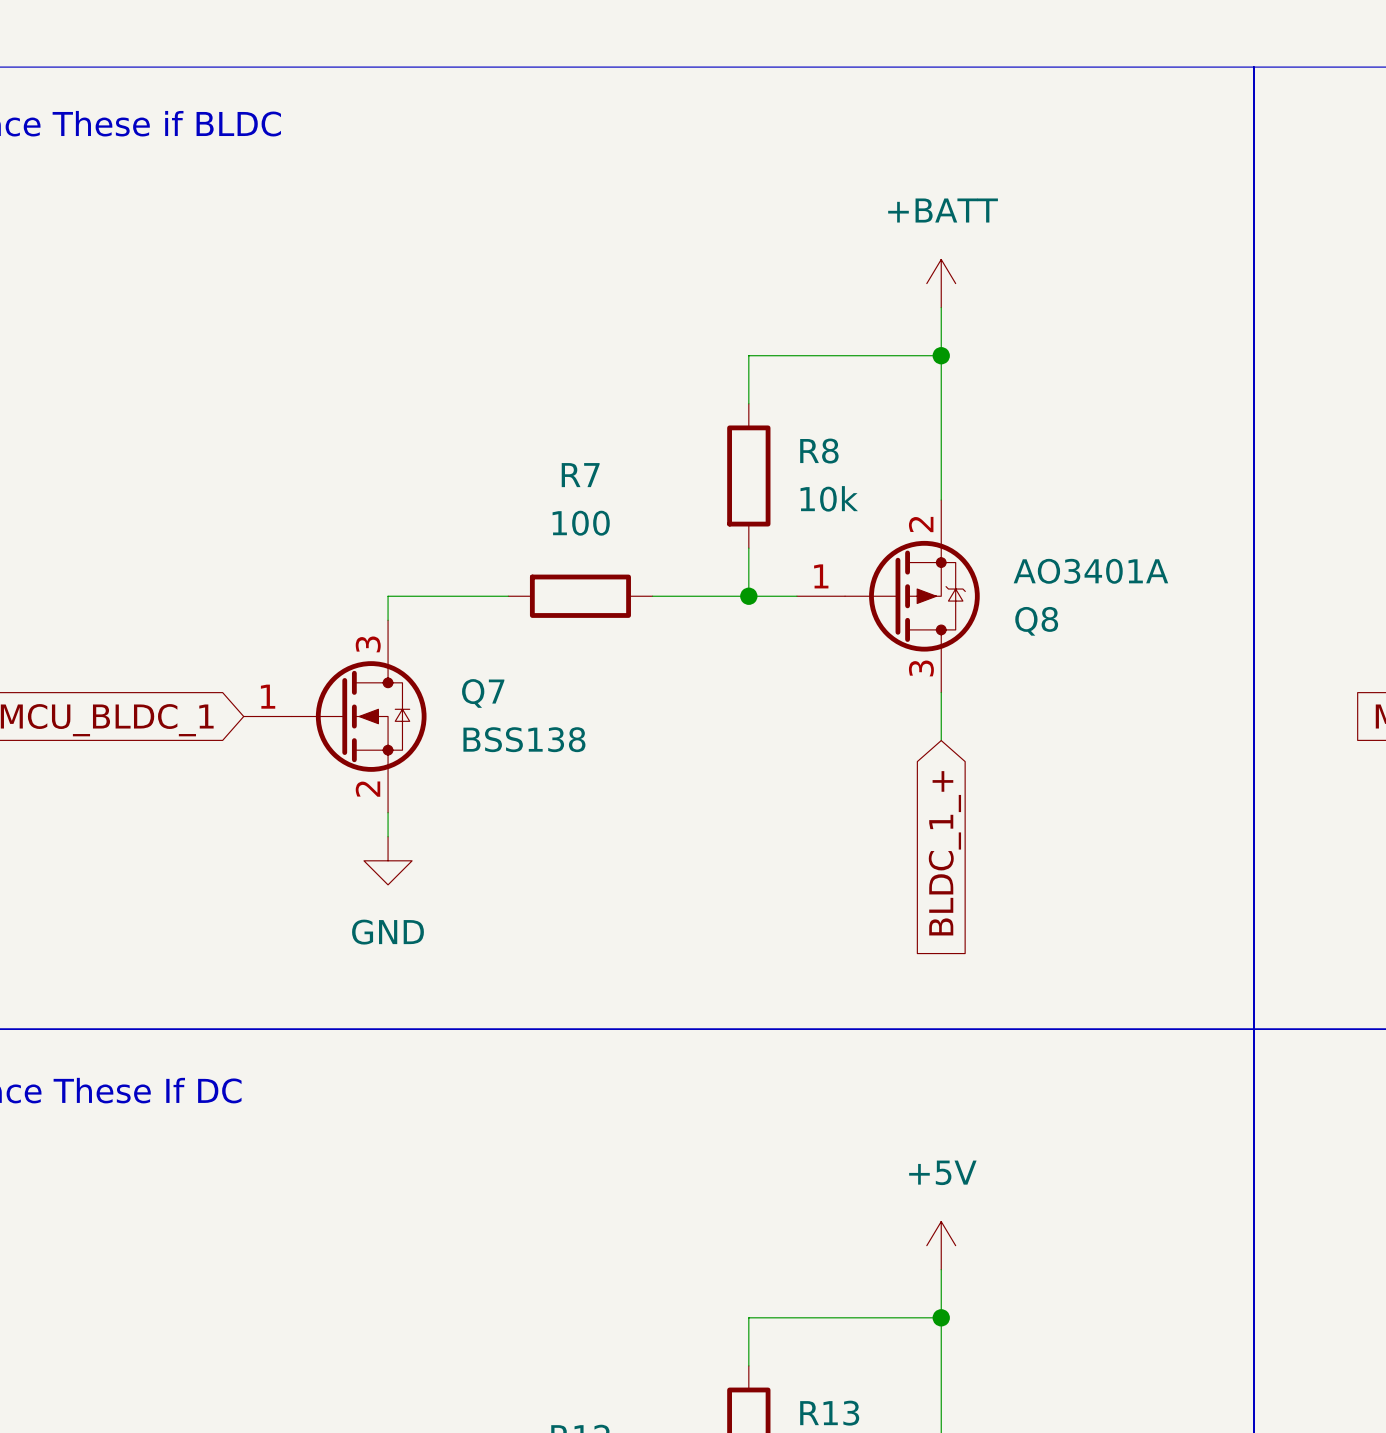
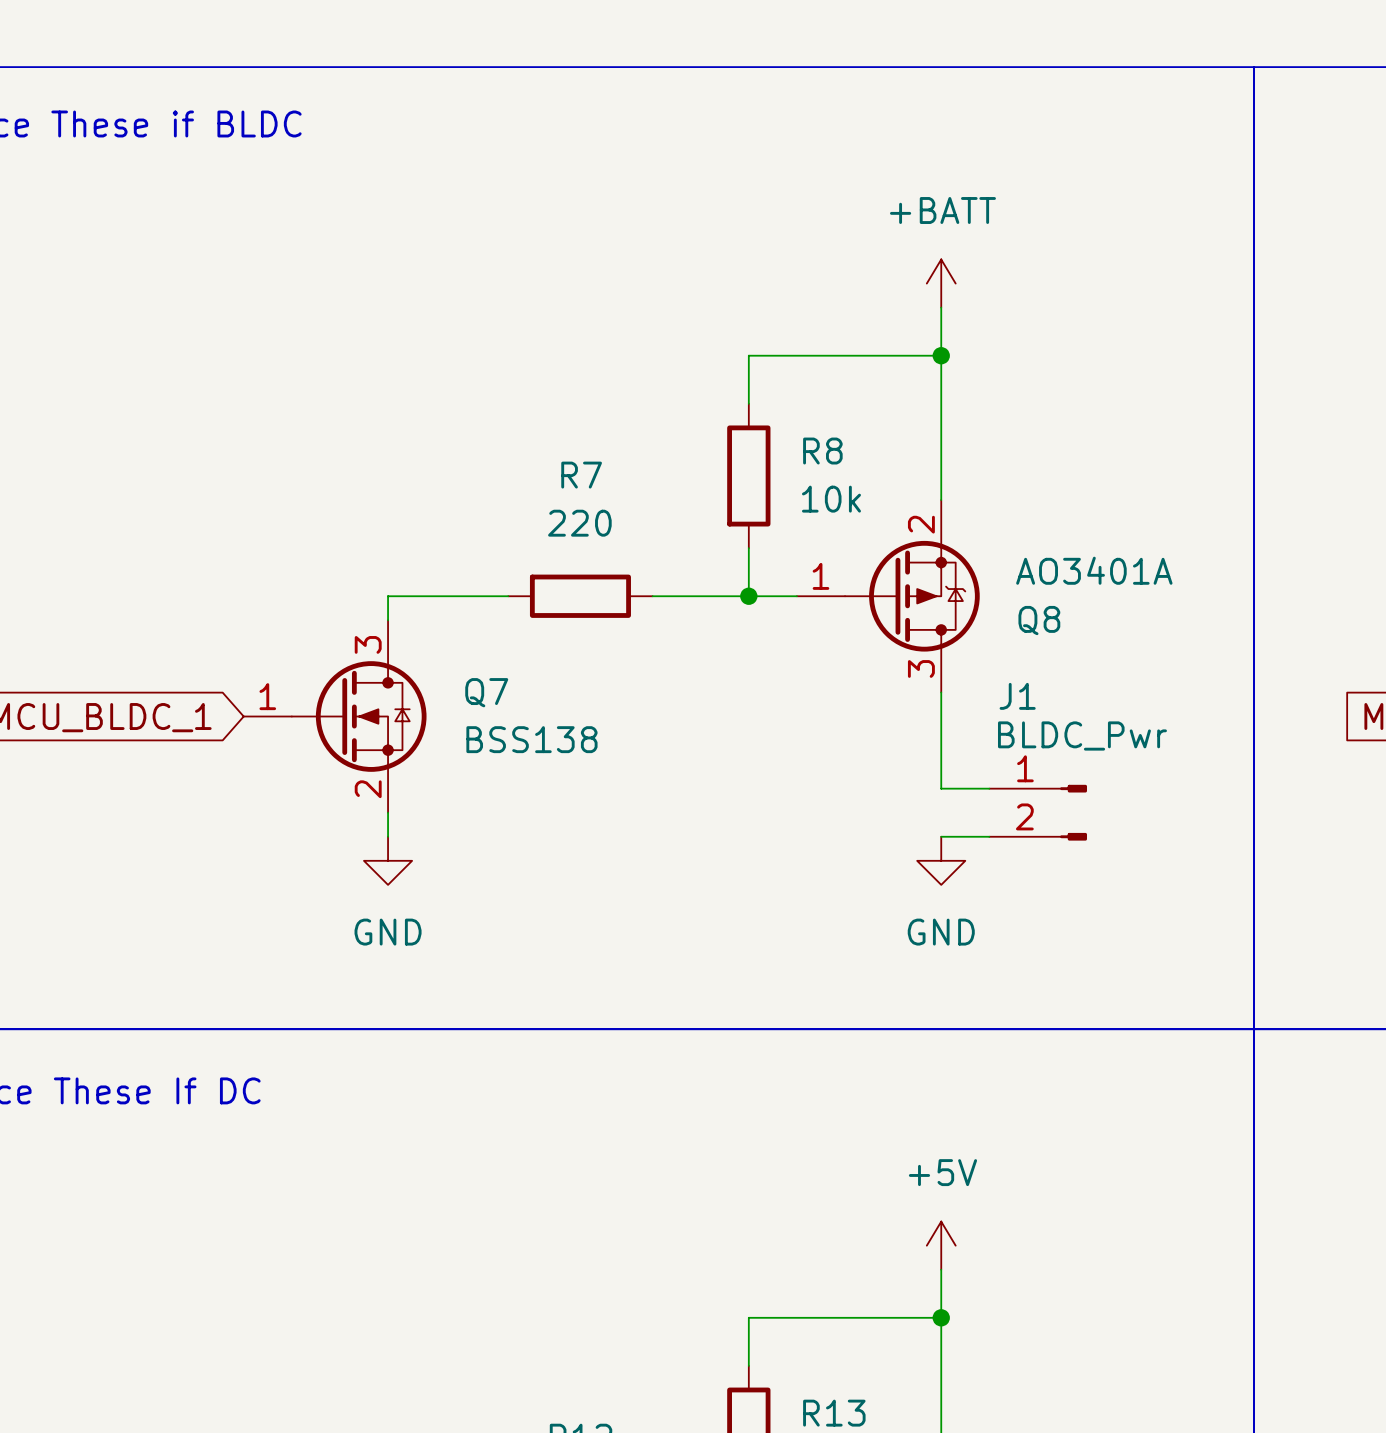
R7 value: 100 (581, 523) -> 220 (579, 523)
wire: none -> (941, 740) (941, 788) (989, 788)
J1: none -> BLDC_Pwr (1038, 812)
wire: none -> (941, 836) (989, 836)
global label: BLDC_1_+ (944, 853) -> none
power symbol: none -> GND (941, 860)

